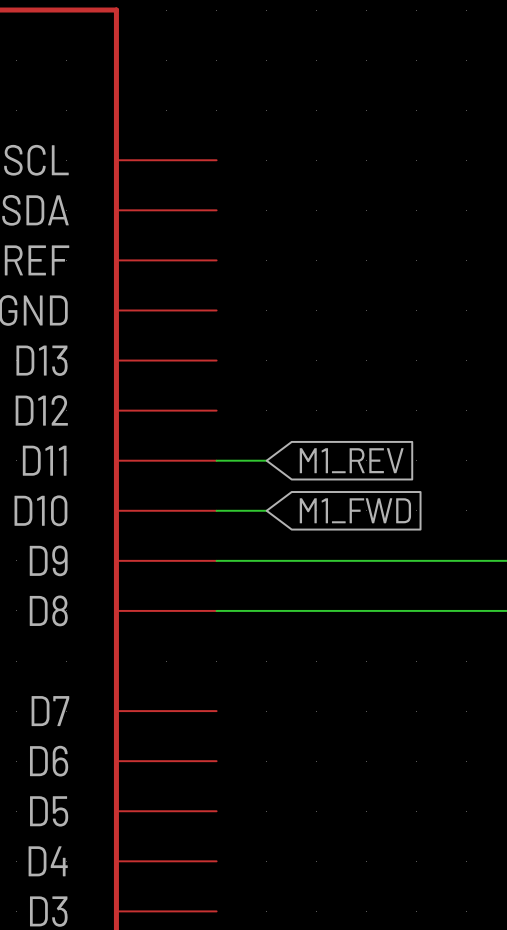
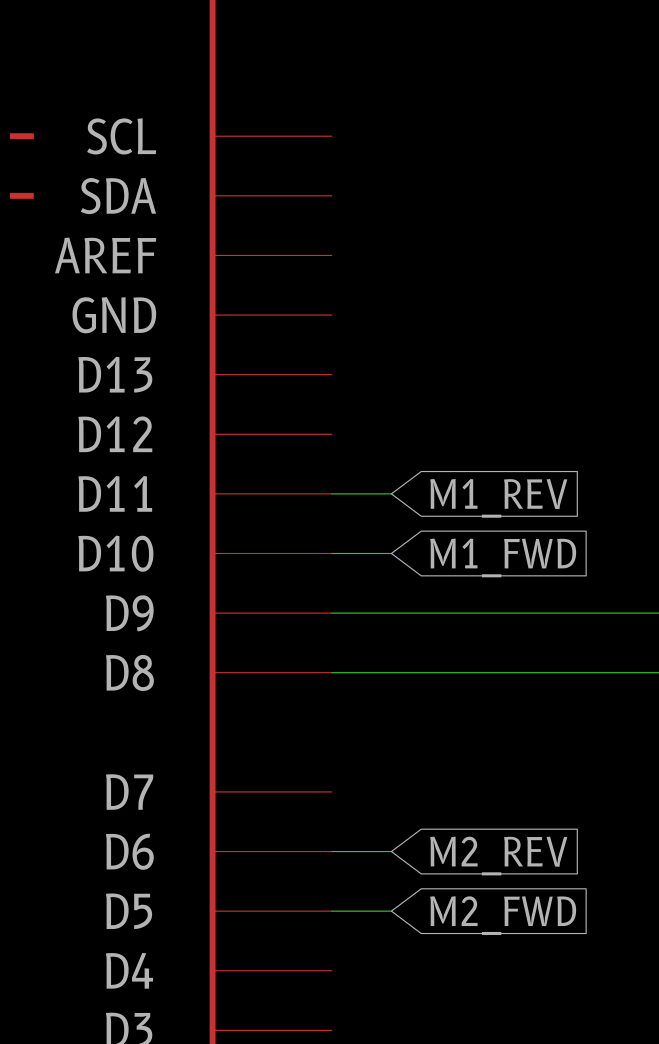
wire: none -> (331, 851) (391, 851)
global label: none -> M2_REV (498, 856)
wire: none -> (331, 911) (391, 911)
global label: none -> M2_FWD (503, 915)

